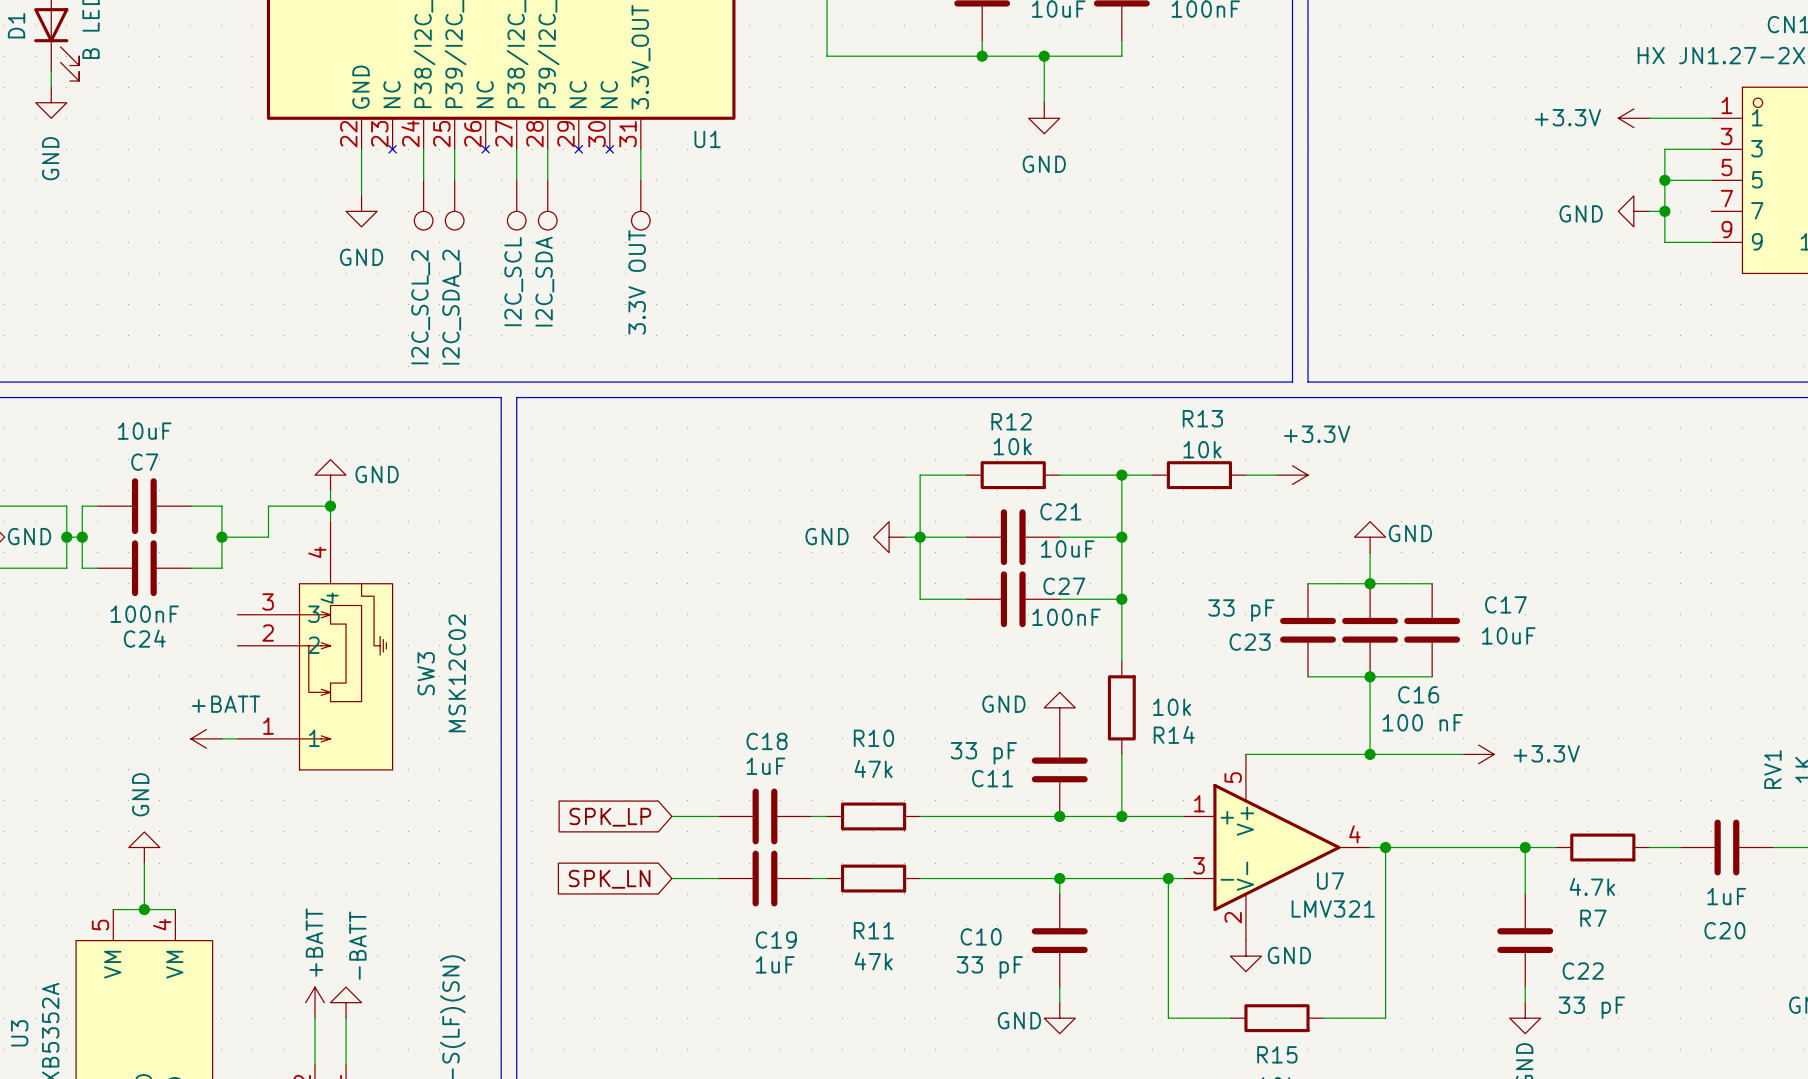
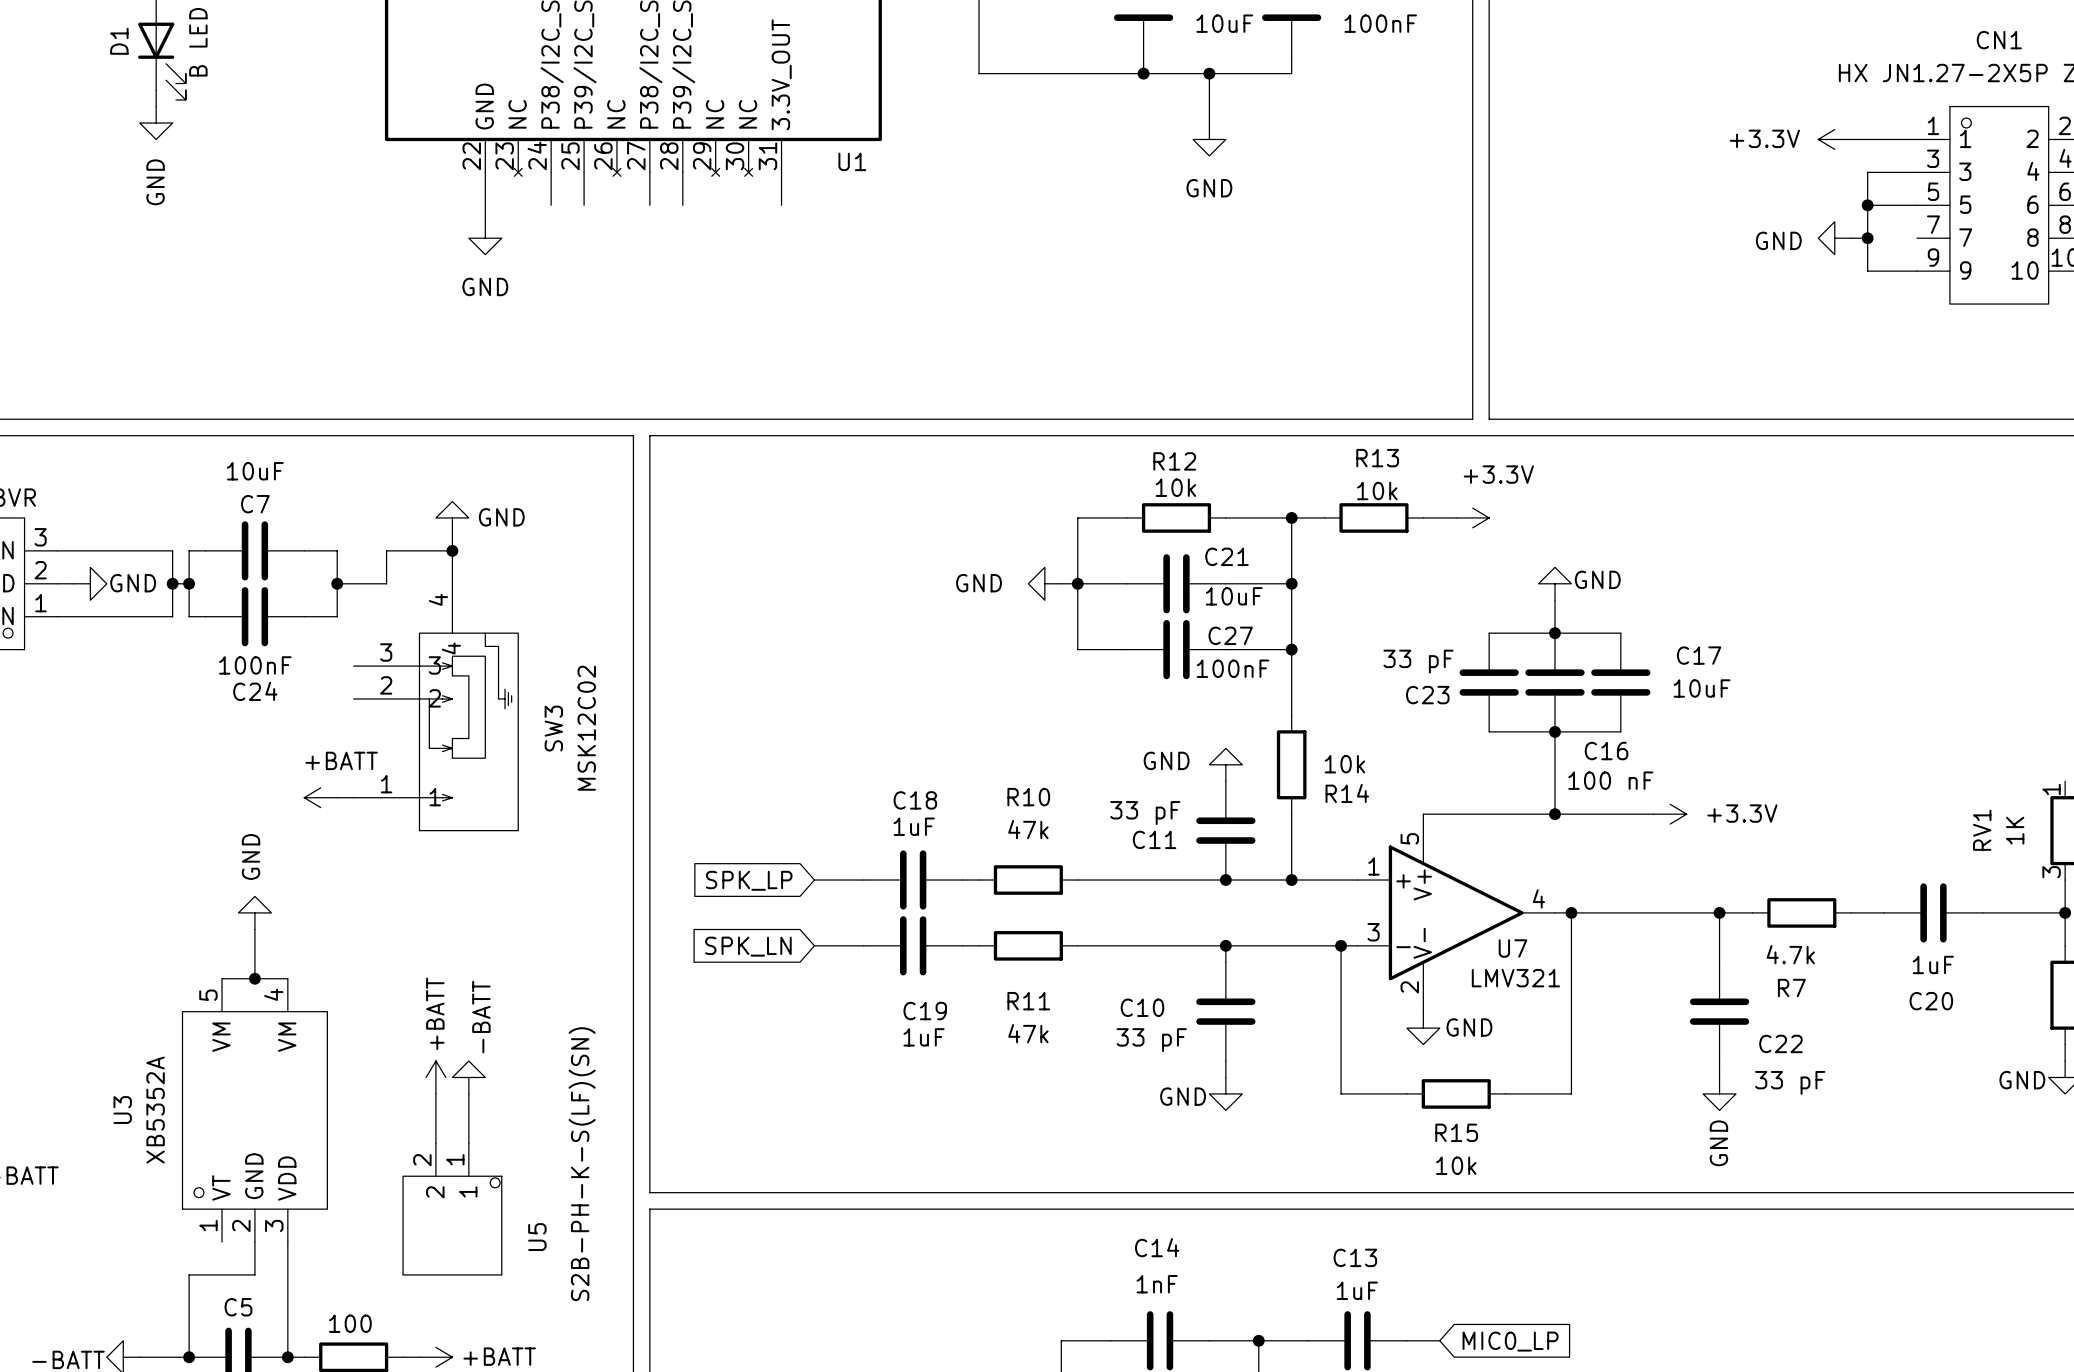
part: I2C_SCL_2 (423, 205) -> none
part: I2C_SDA_2 (454, 205) -> none
part: I2C_SCL (516, 205) -> none
part: I2C_SDA (547, 205) -> none
part: 3.3V OUT (640, 205) -> none

